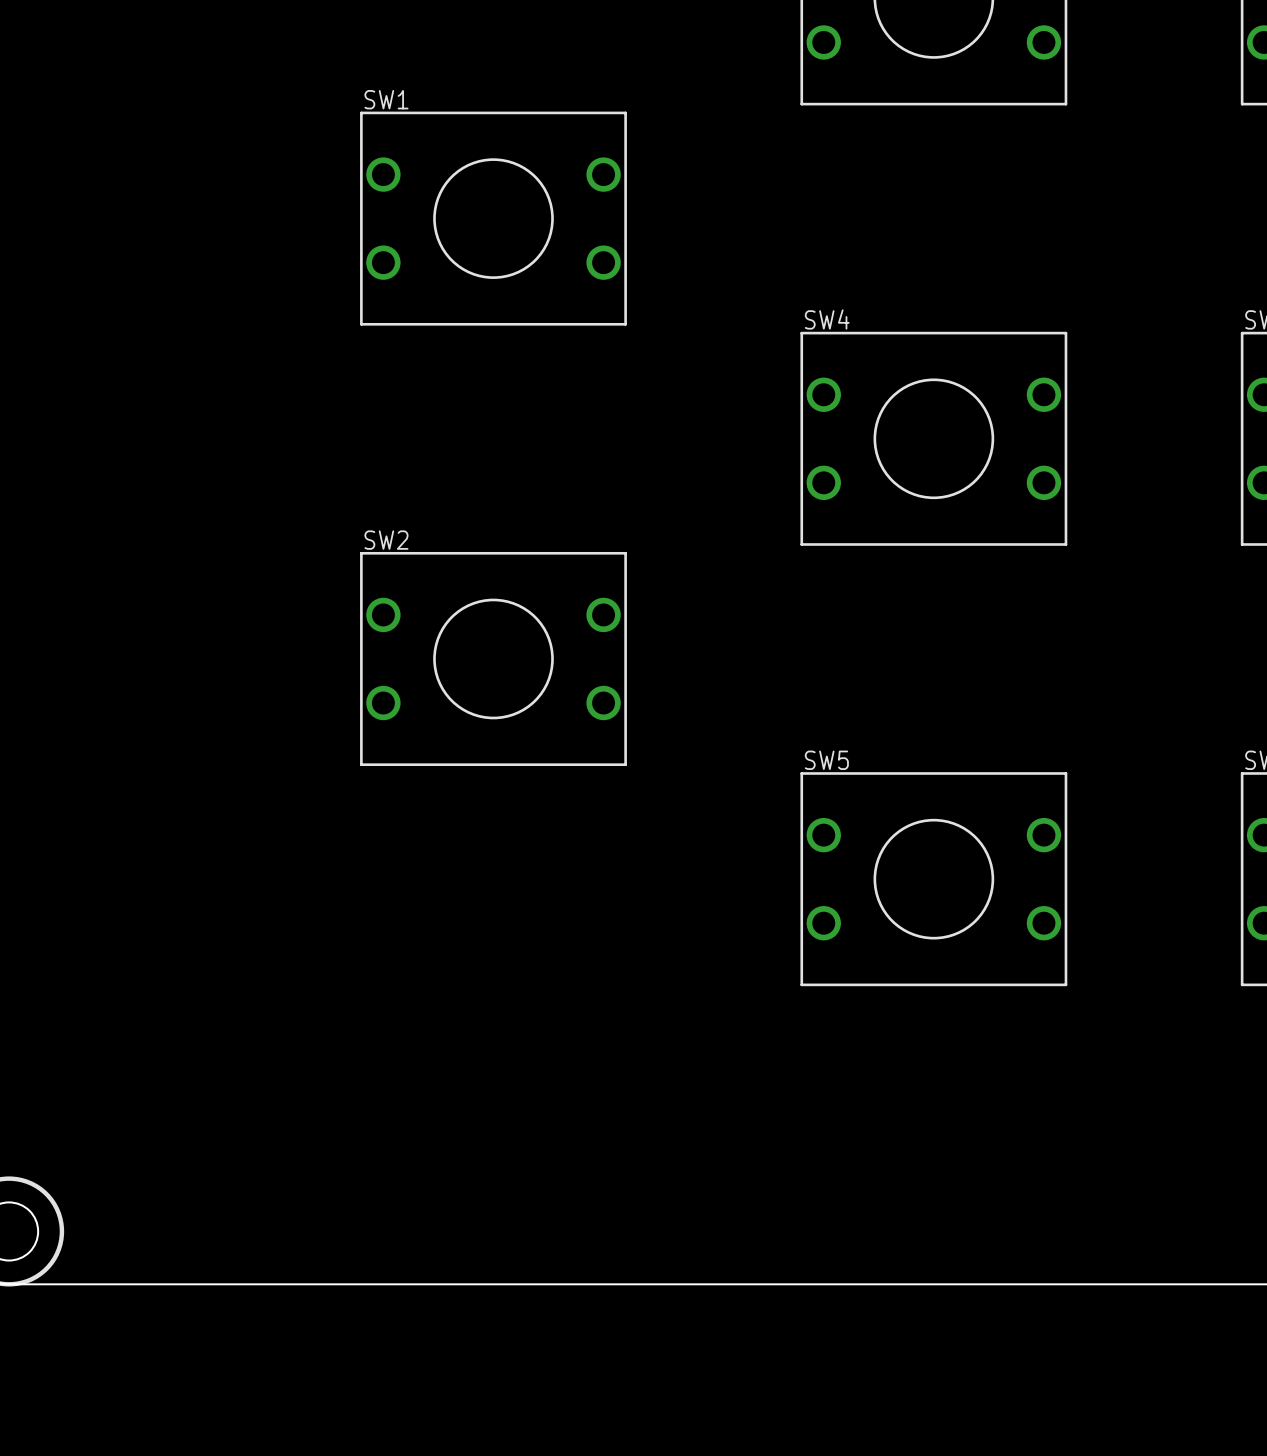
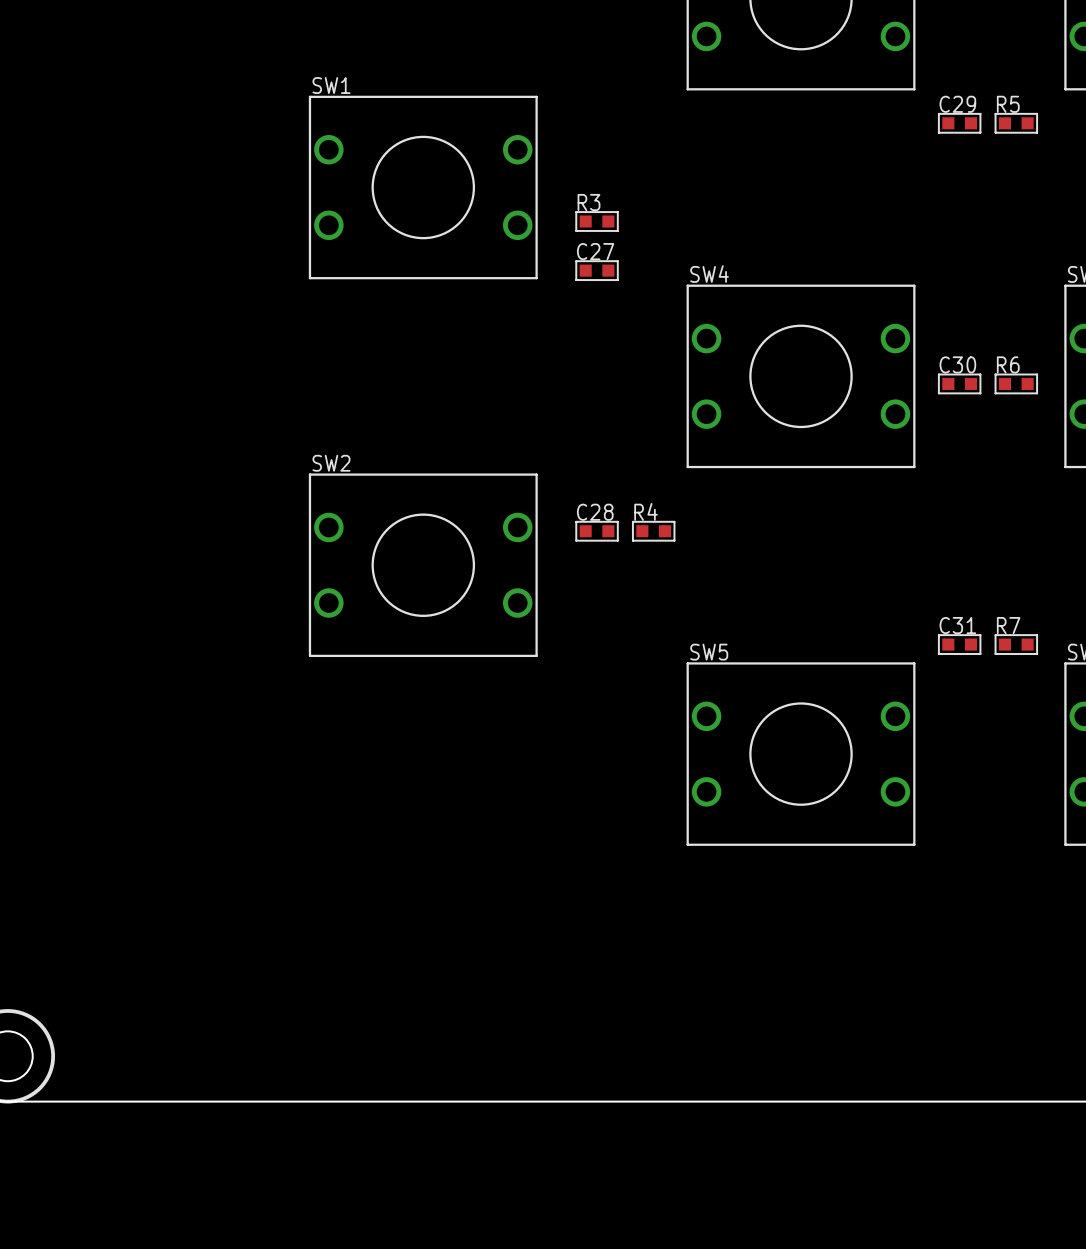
C29: none -> (959, 123)
R5: none -> (1016, 123)
R3: none -> (597, 221)
C27: none -> (597, 270)
C30: none -> (959, 383)
R6: none -> (1016, 383)
C28: none -> (597, 531)
R4: none -> (653, 531)
C31: none -> (959, 644)
R7: none -> (1016, 644)

